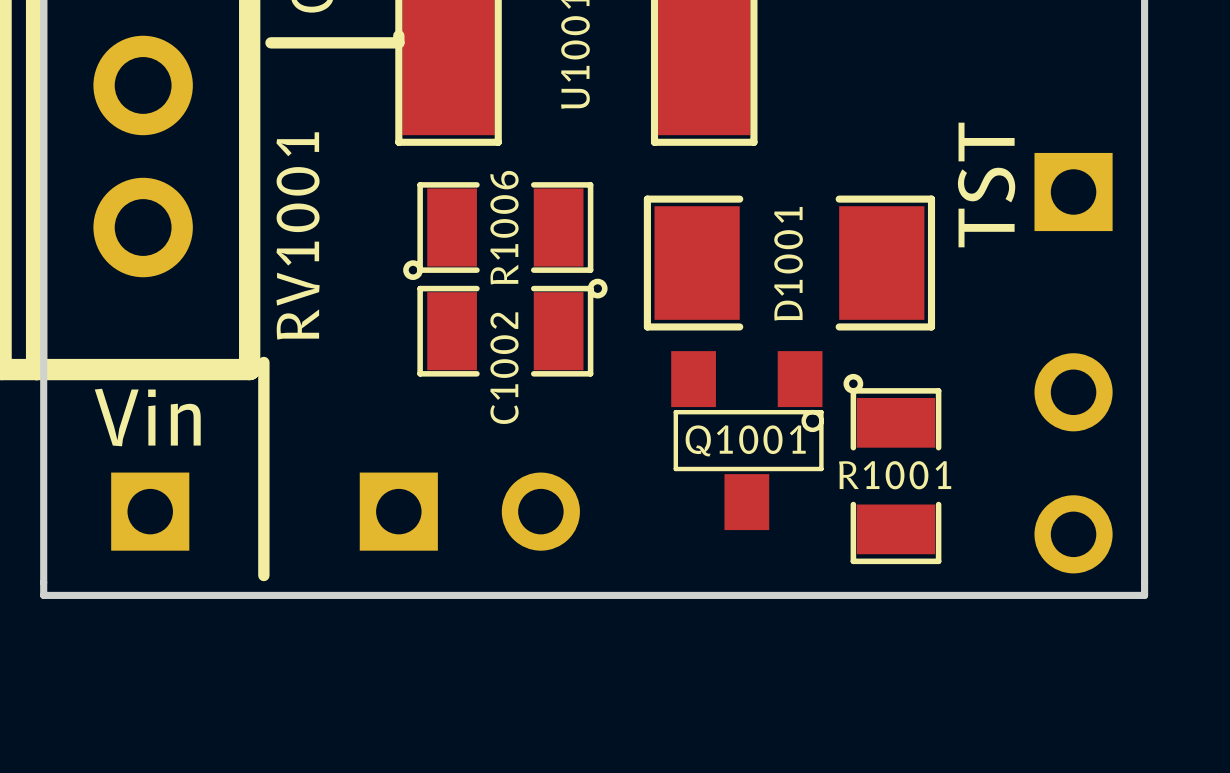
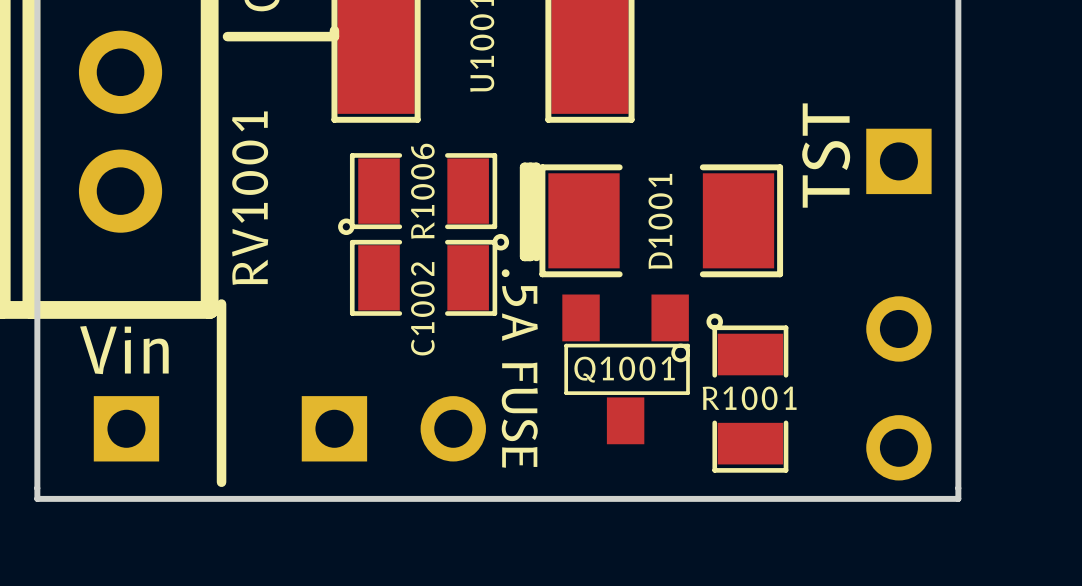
line: none -> (530, 167) (530, 256) (524, 256) (524, 167) (536, 167) (536, 256)
text: none -> .5A FUSE (519, 368)

